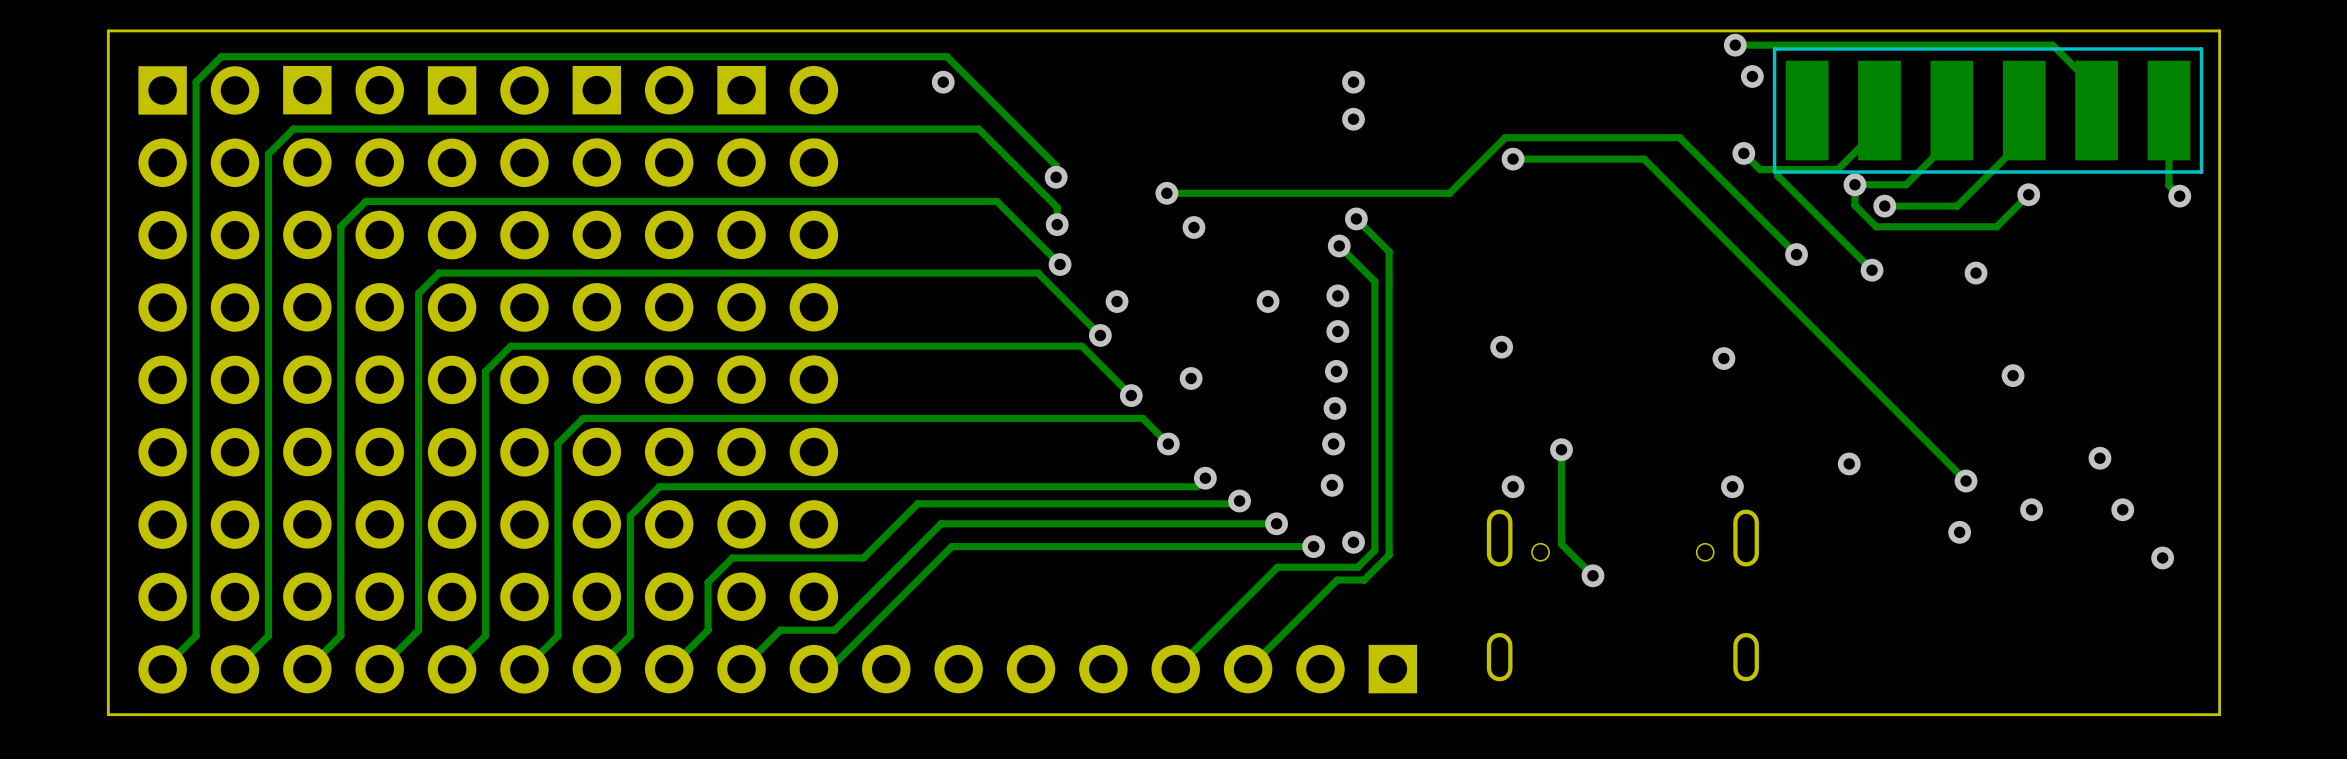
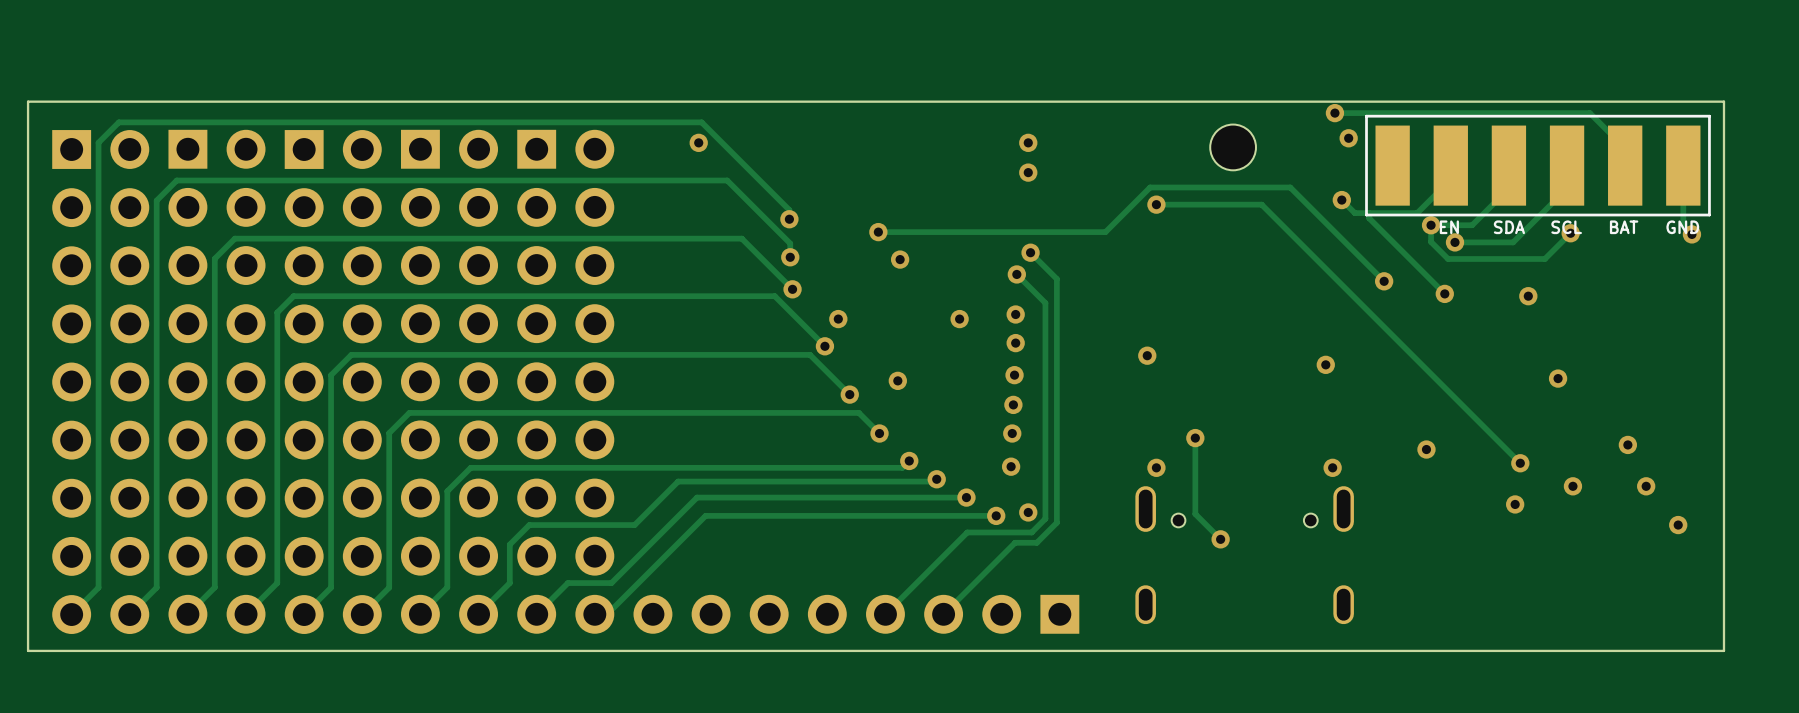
part: none -> (1233, 147)
text: none -> EN (1449, 227)
text: none -> SDA (1509, 227)
text: none -> SCL (1566, 227)
text: none -> BAT (1624, 227)
text: none -> GND (1682, 227)

